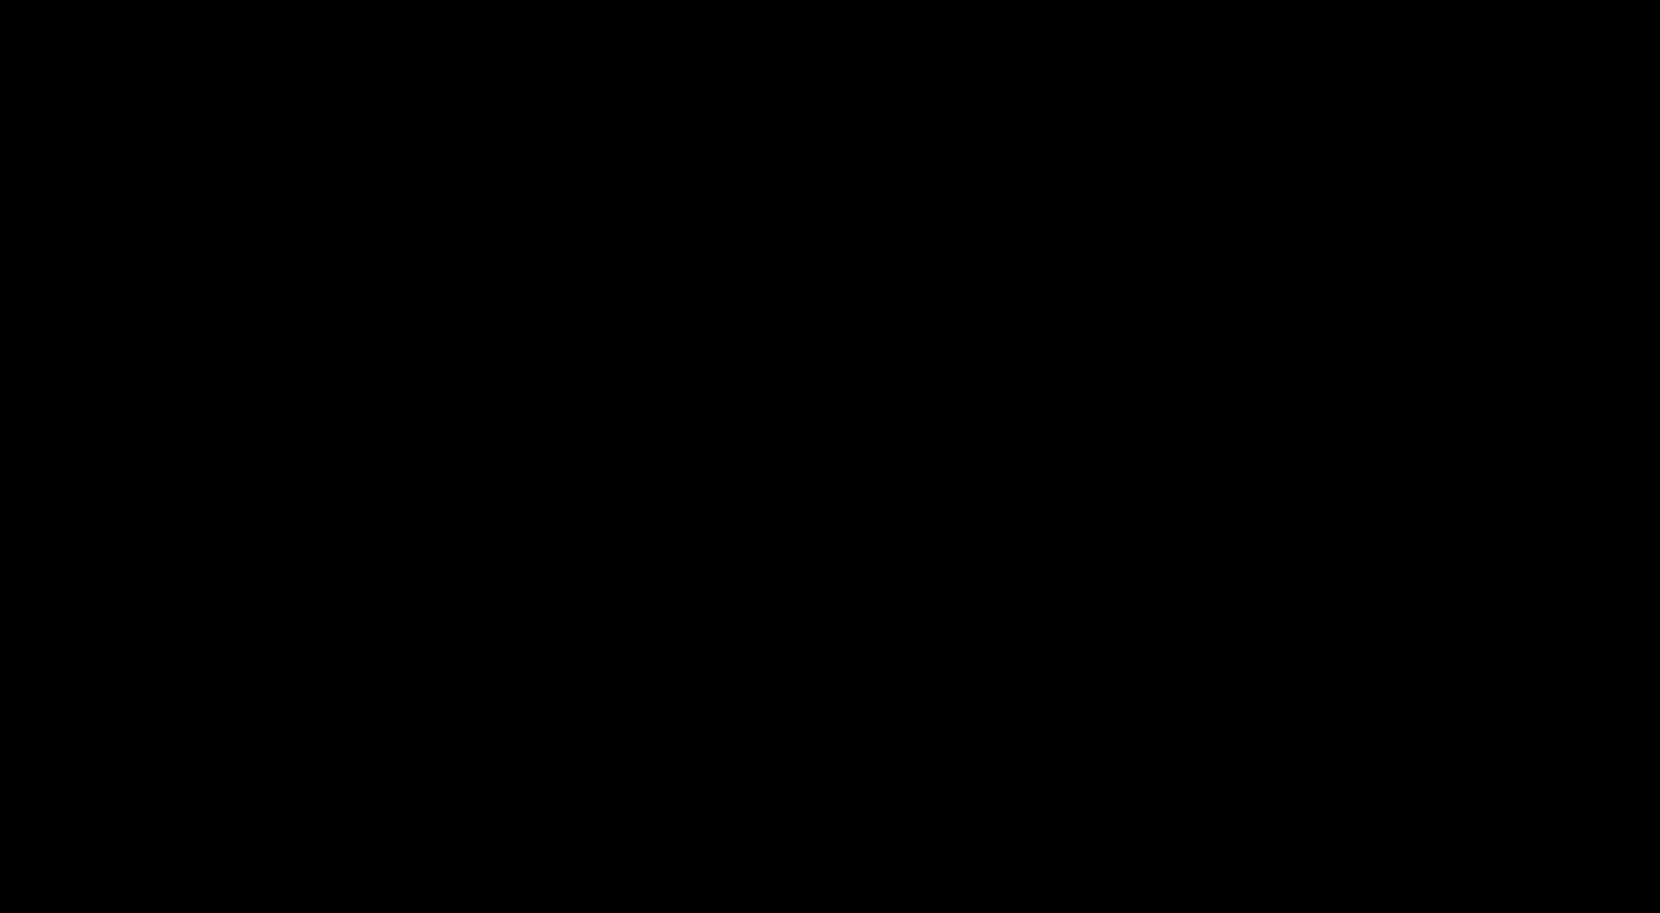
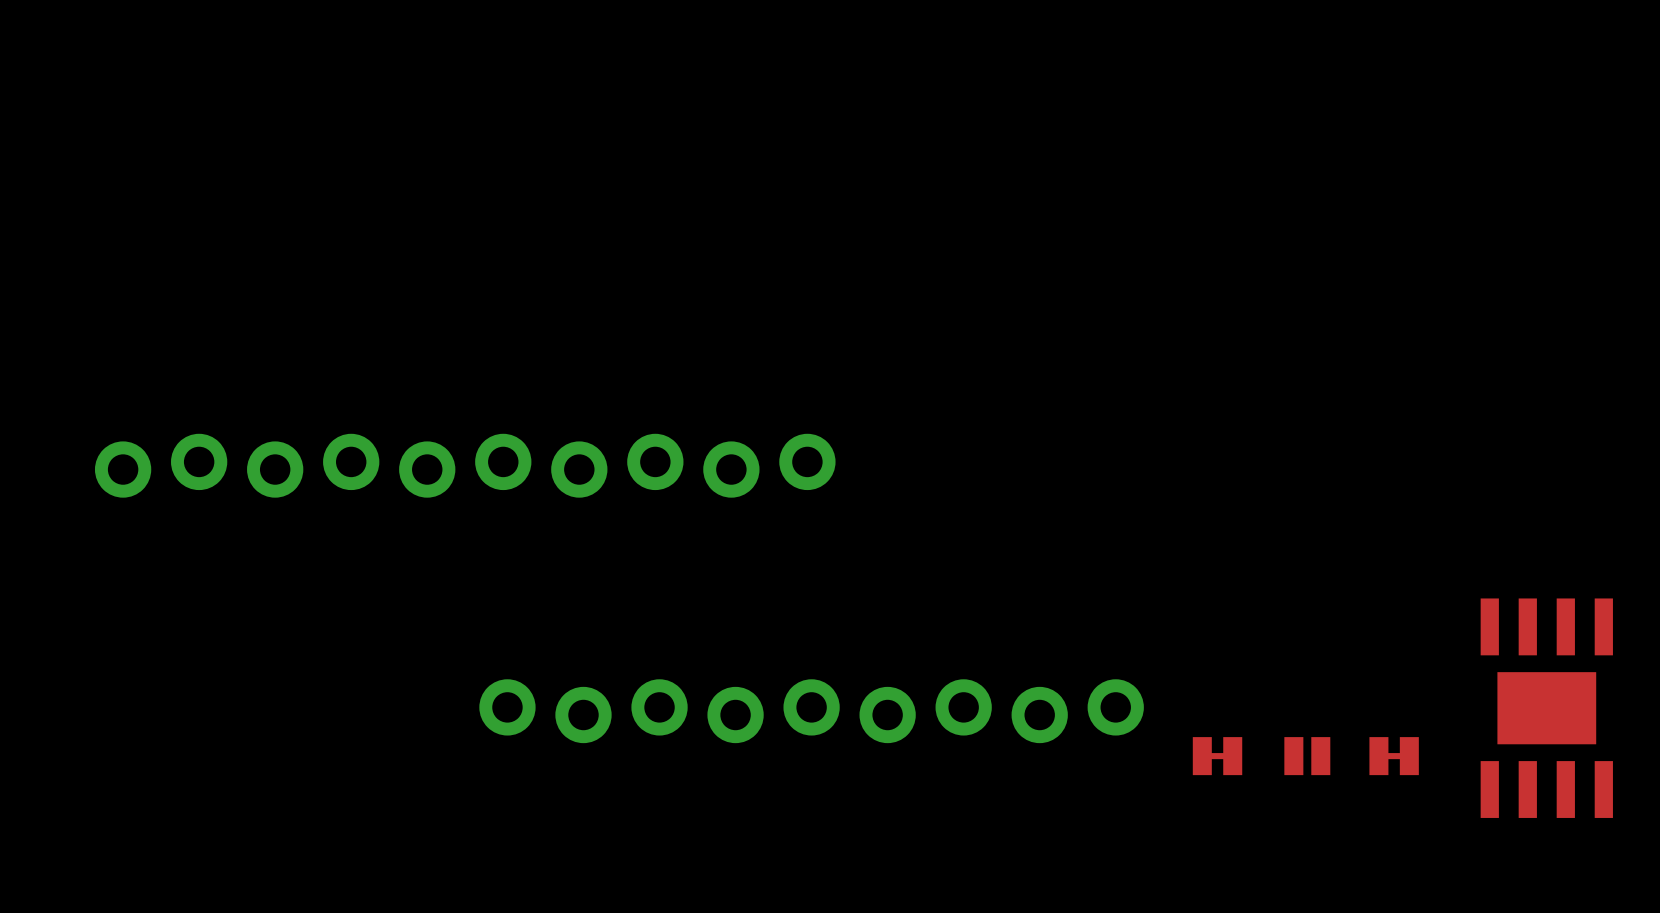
part: none -> (465, 465)
part: none -> (1546, 708)
part: none -> (811, 711)
part: none -> (1217, 756)
part: none -> (1307, 756)
part: none -> (1394, 756)

